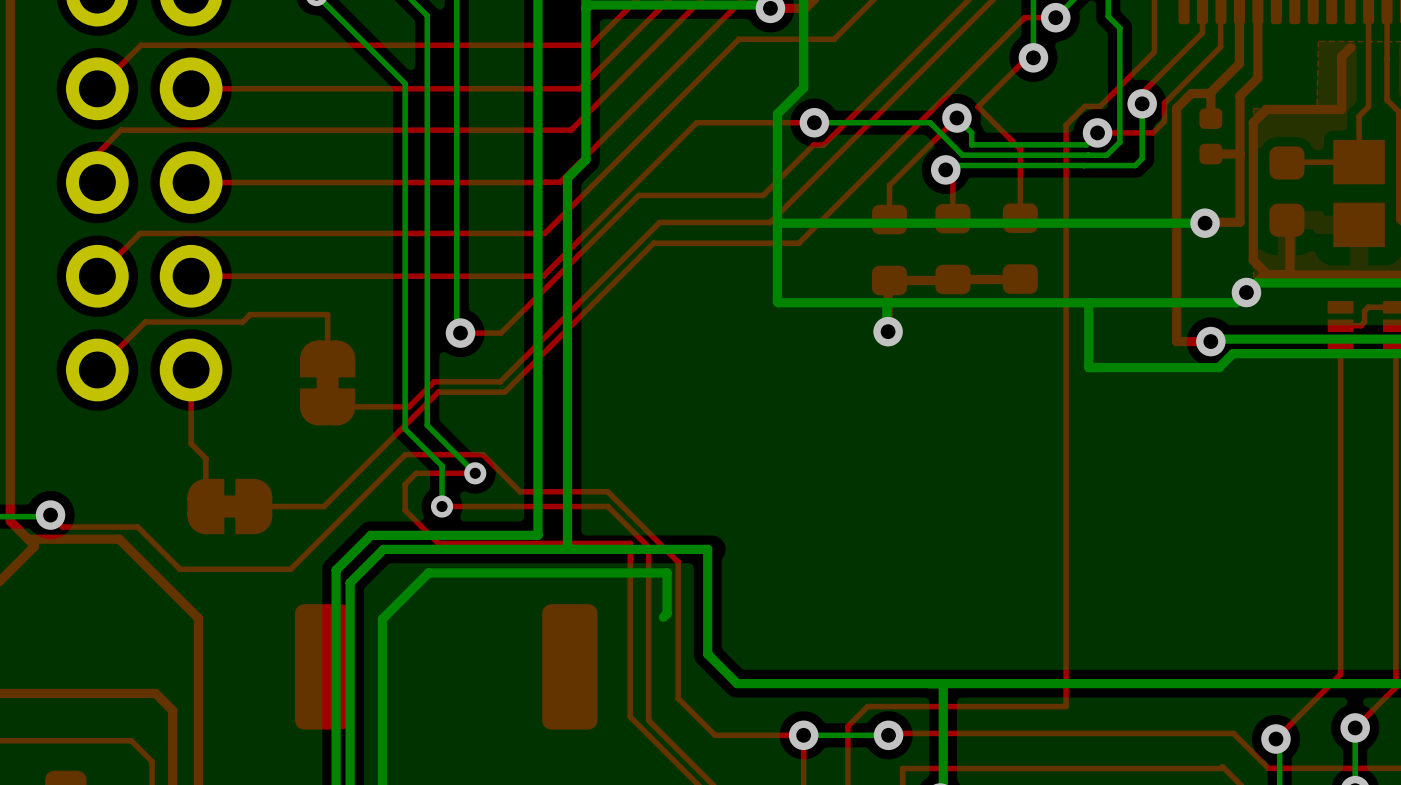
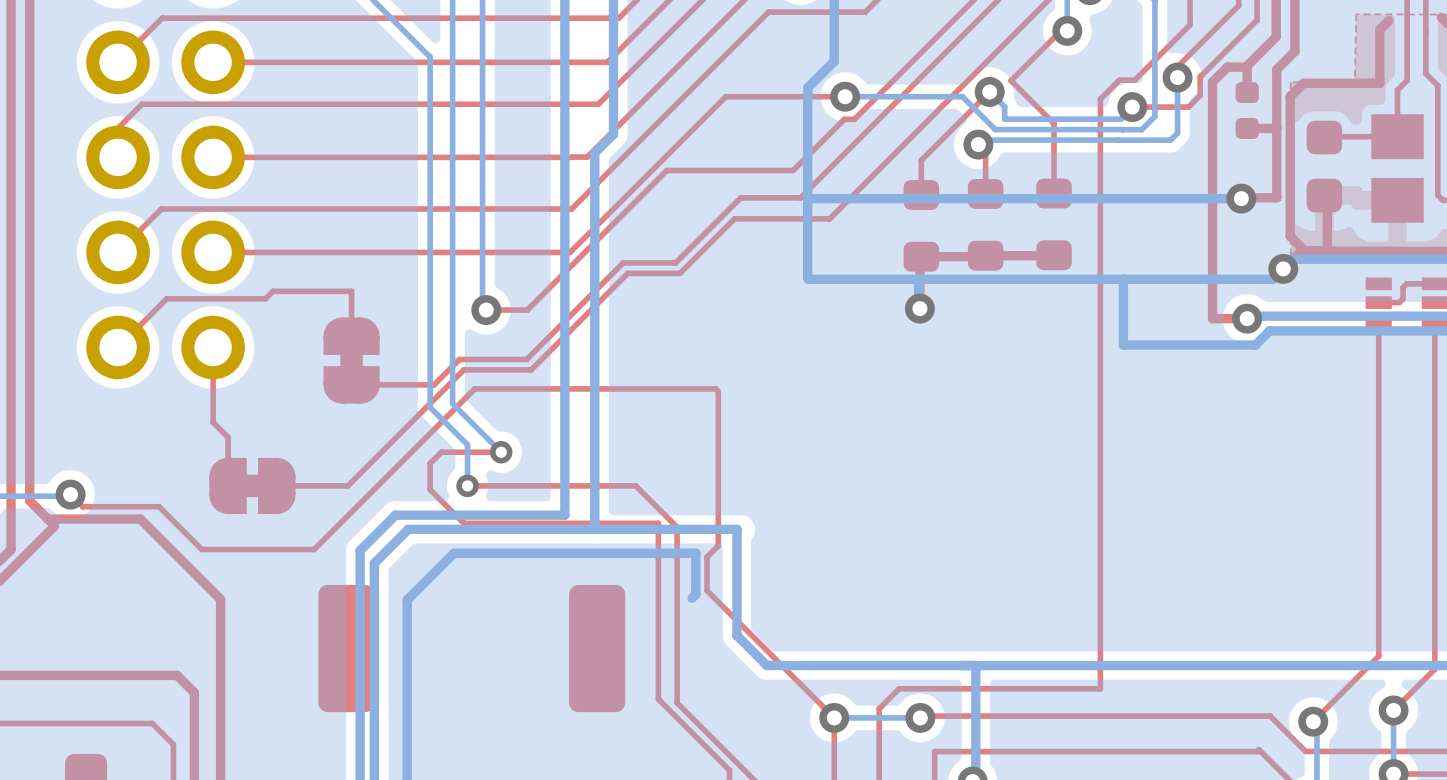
top track: (711, 222) (659, 222) (595, 286) -> (740, 197) (675, 262) (623, 262)
top track: (705, 243) (653, 243) (599, 296) -> (734, 218) (680, 273) (627, 273)
top track: (405, 454) (482, 454) (520, 491) (607, 491) (678, 562) (678, 576) -> (430, 433) (474, 388) (715, 388) (718, 391) (718, 545) (707, 557)
top track: (678, 609) (678, 698) (715, 735) (803, 735) -> (707, 590) (834, 717)

